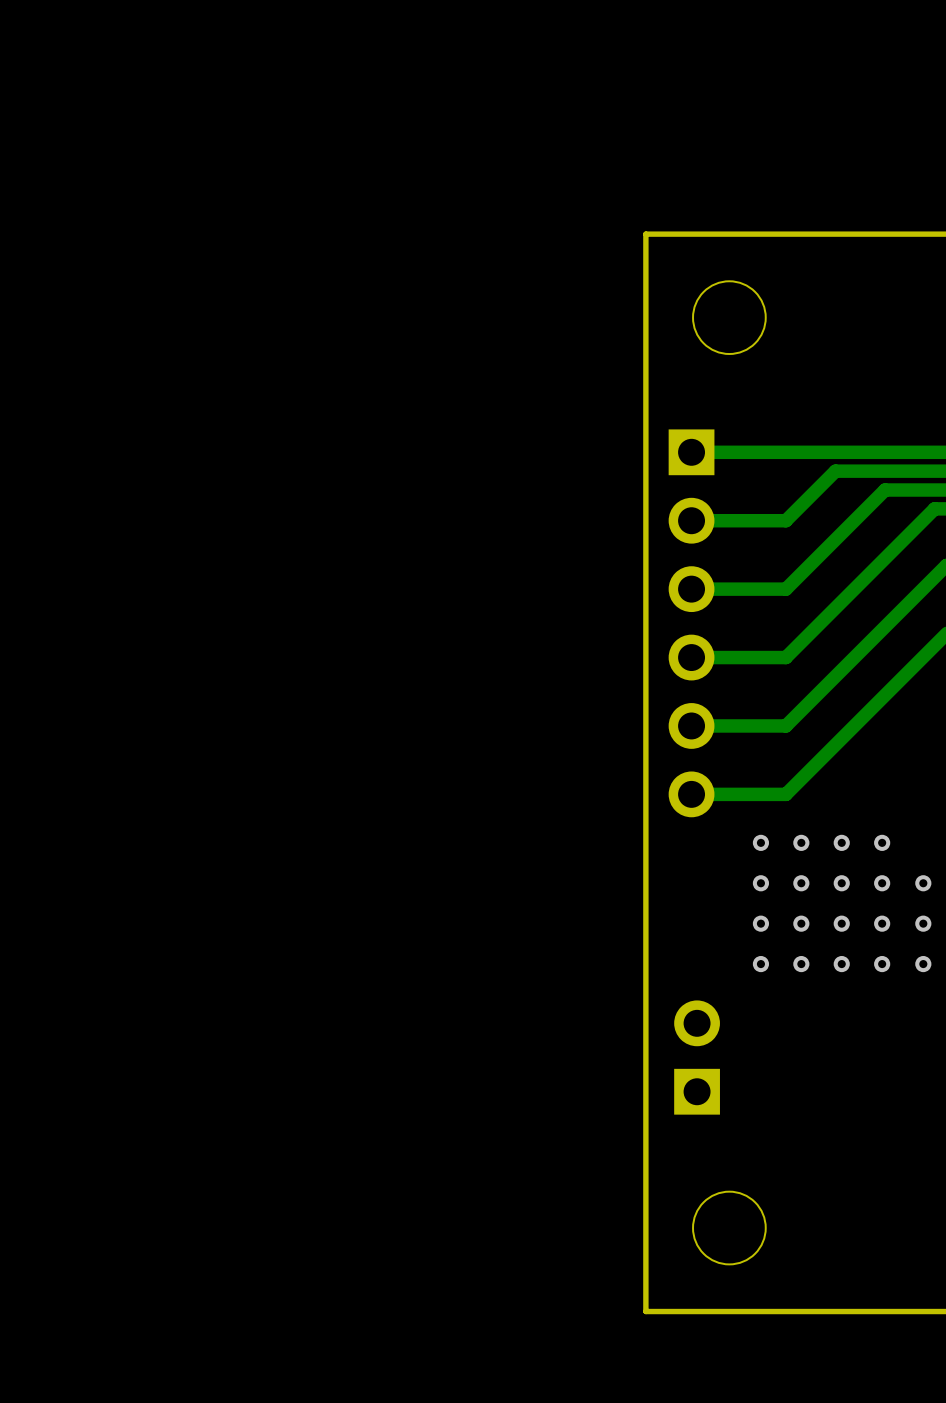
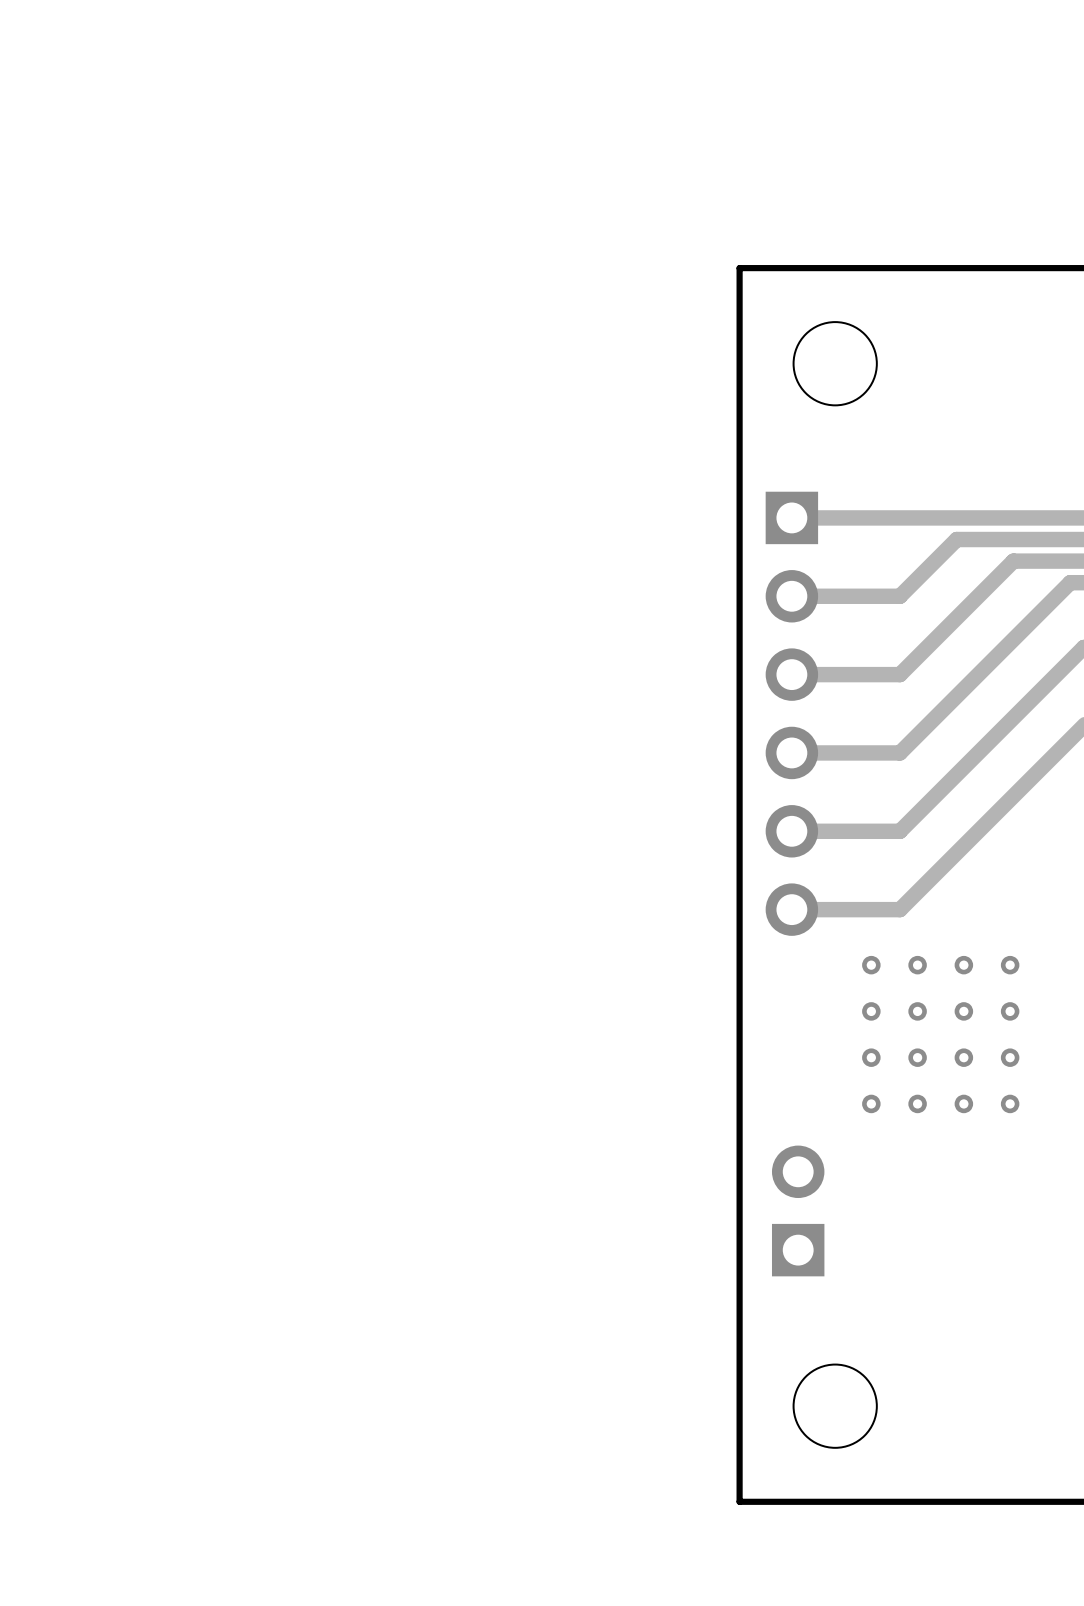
via: (923, 883) -> none
via: (923, 923) -> none
via: (923, 964) -> none

